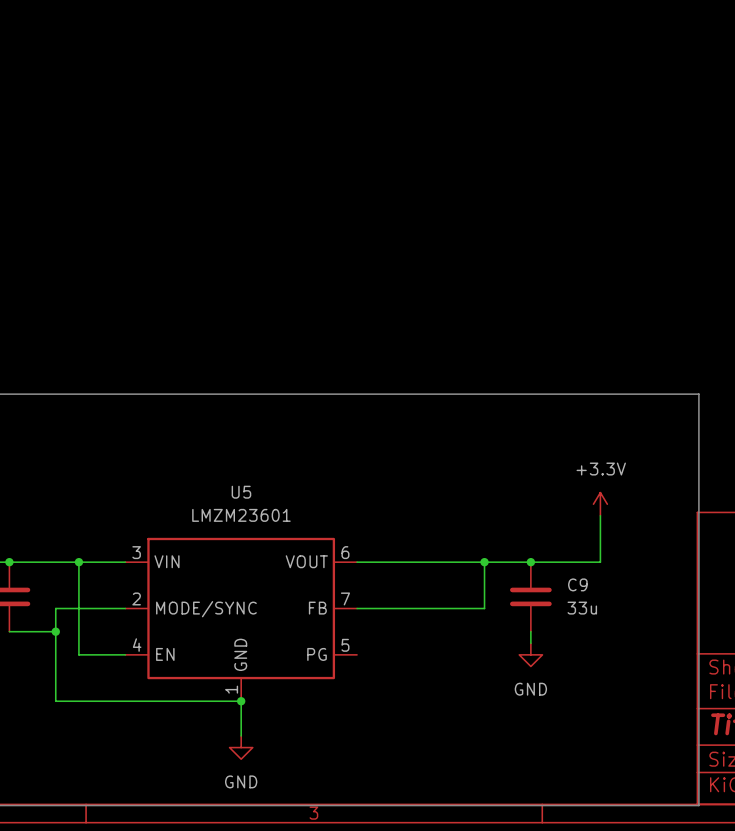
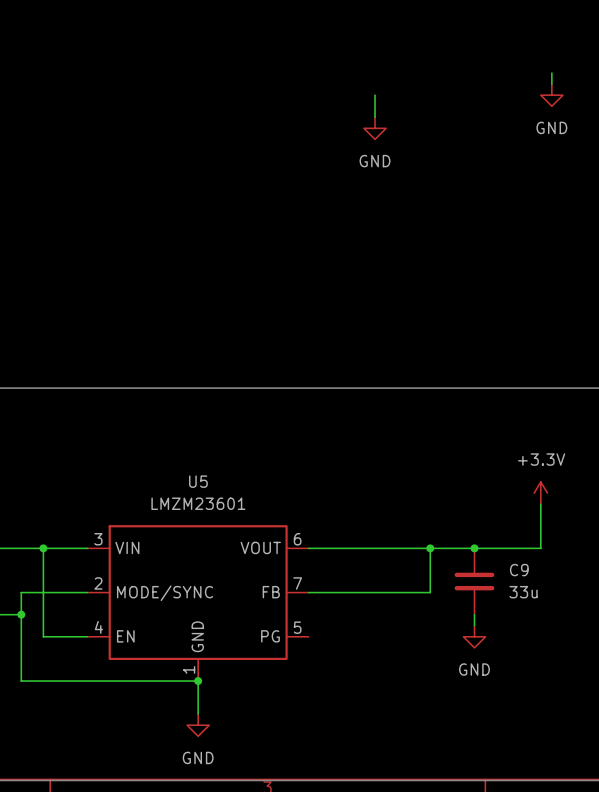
wire: none -> (551, 73) (551, 84)
wire: none -> (375, 95) (375, 117)
power symbol: none -> GND (551, 95)
power symbol: none -> GND (375, 128)

